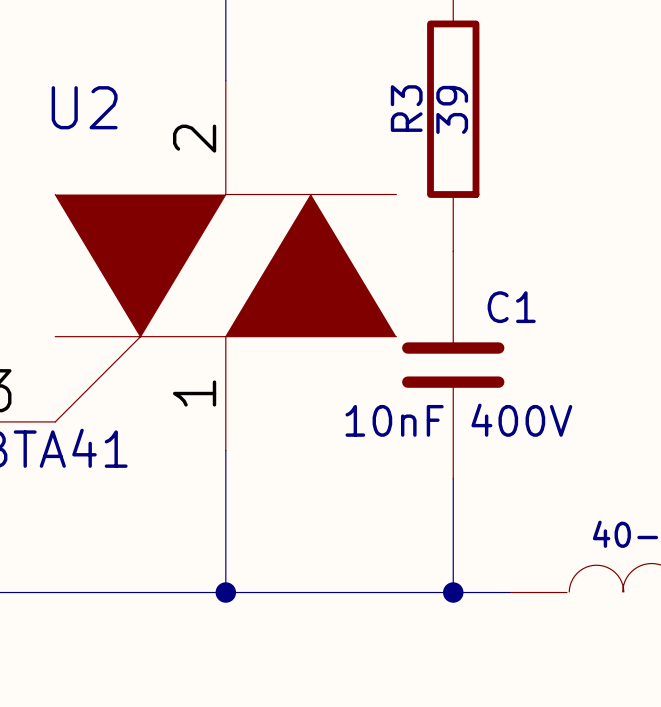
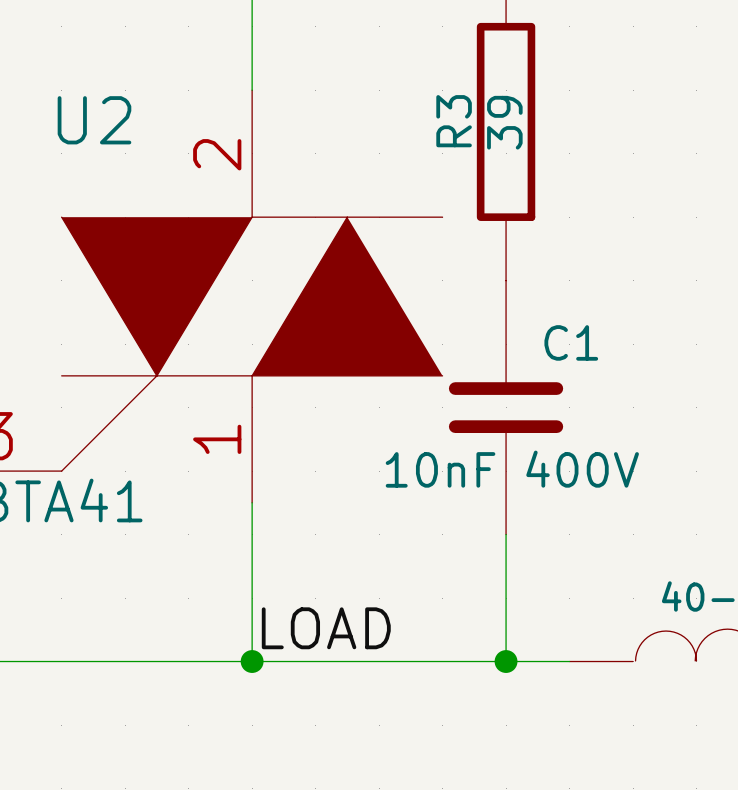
label: none -> LOAD (326, 628)

